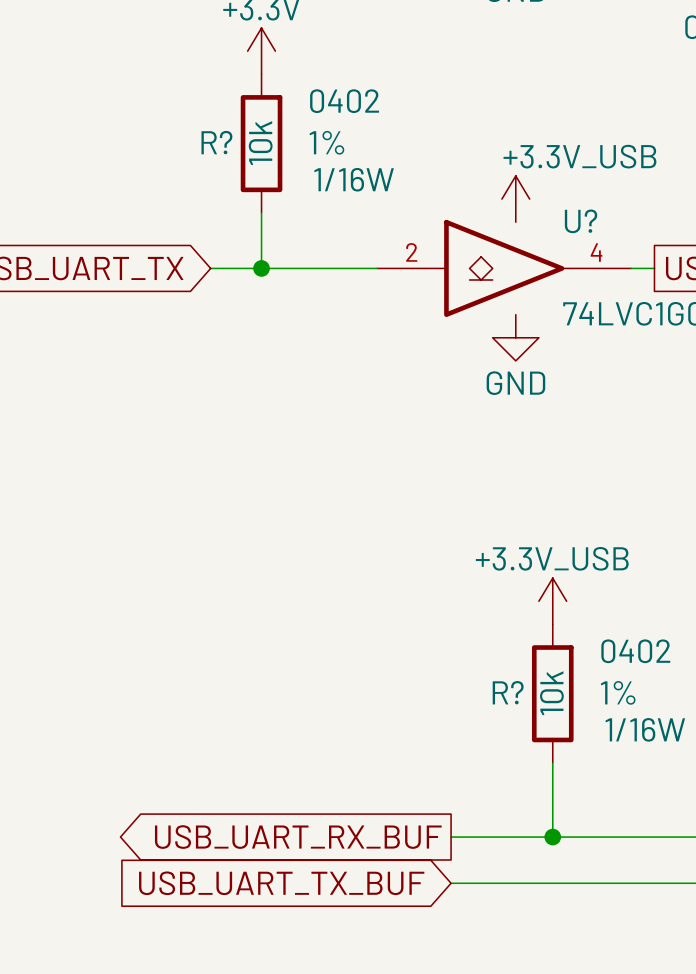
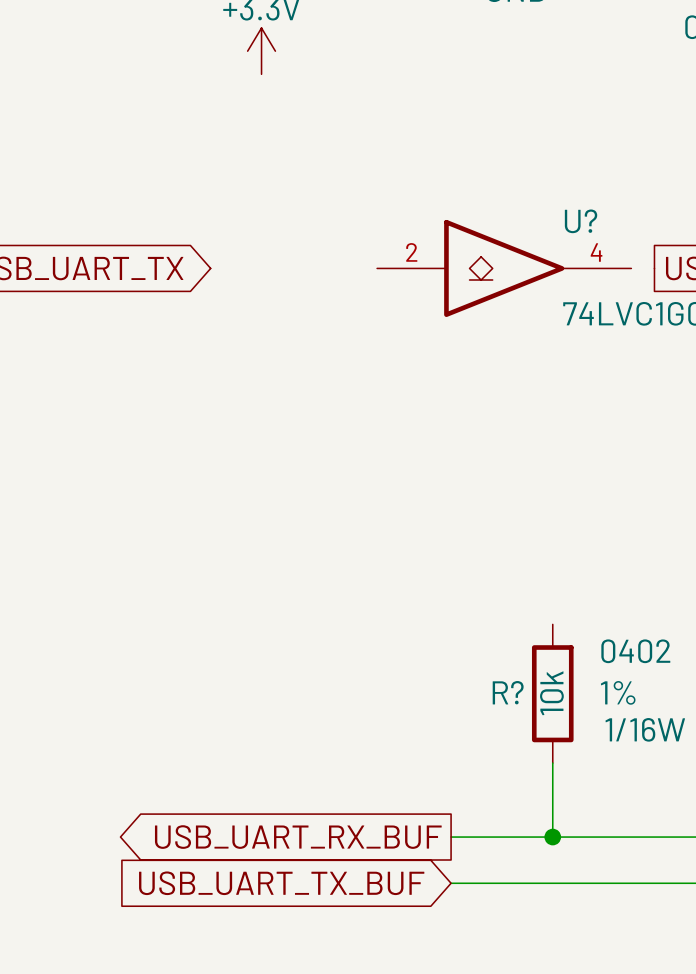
R?: 10k (261, 143) -> none
power symbol: +3.3V_USB (515, 199) -> none
wire: (261, 212) (261, 268) -> none
wire: (210, 268) (377, 268) -> none
junction: (261, 268) -> none
wire: (631, 268) (654, 268) -> none
power symbol: GND (515, 337) -> none
power symbol: +3.3V_USB (552, 601) -> none

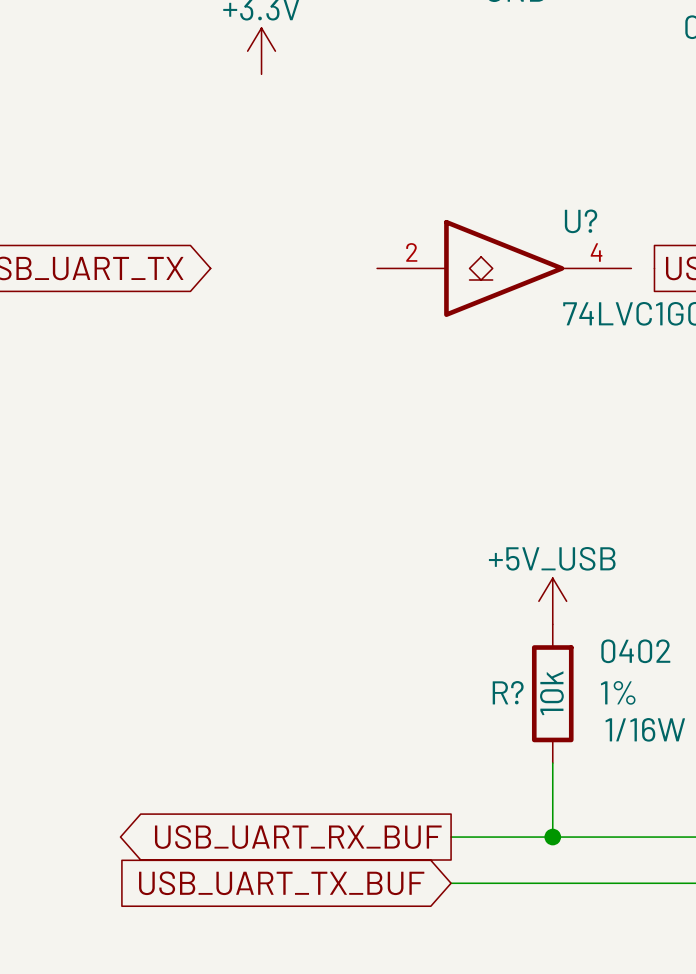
power symbol: none -> +5V_USB (552, 601)

